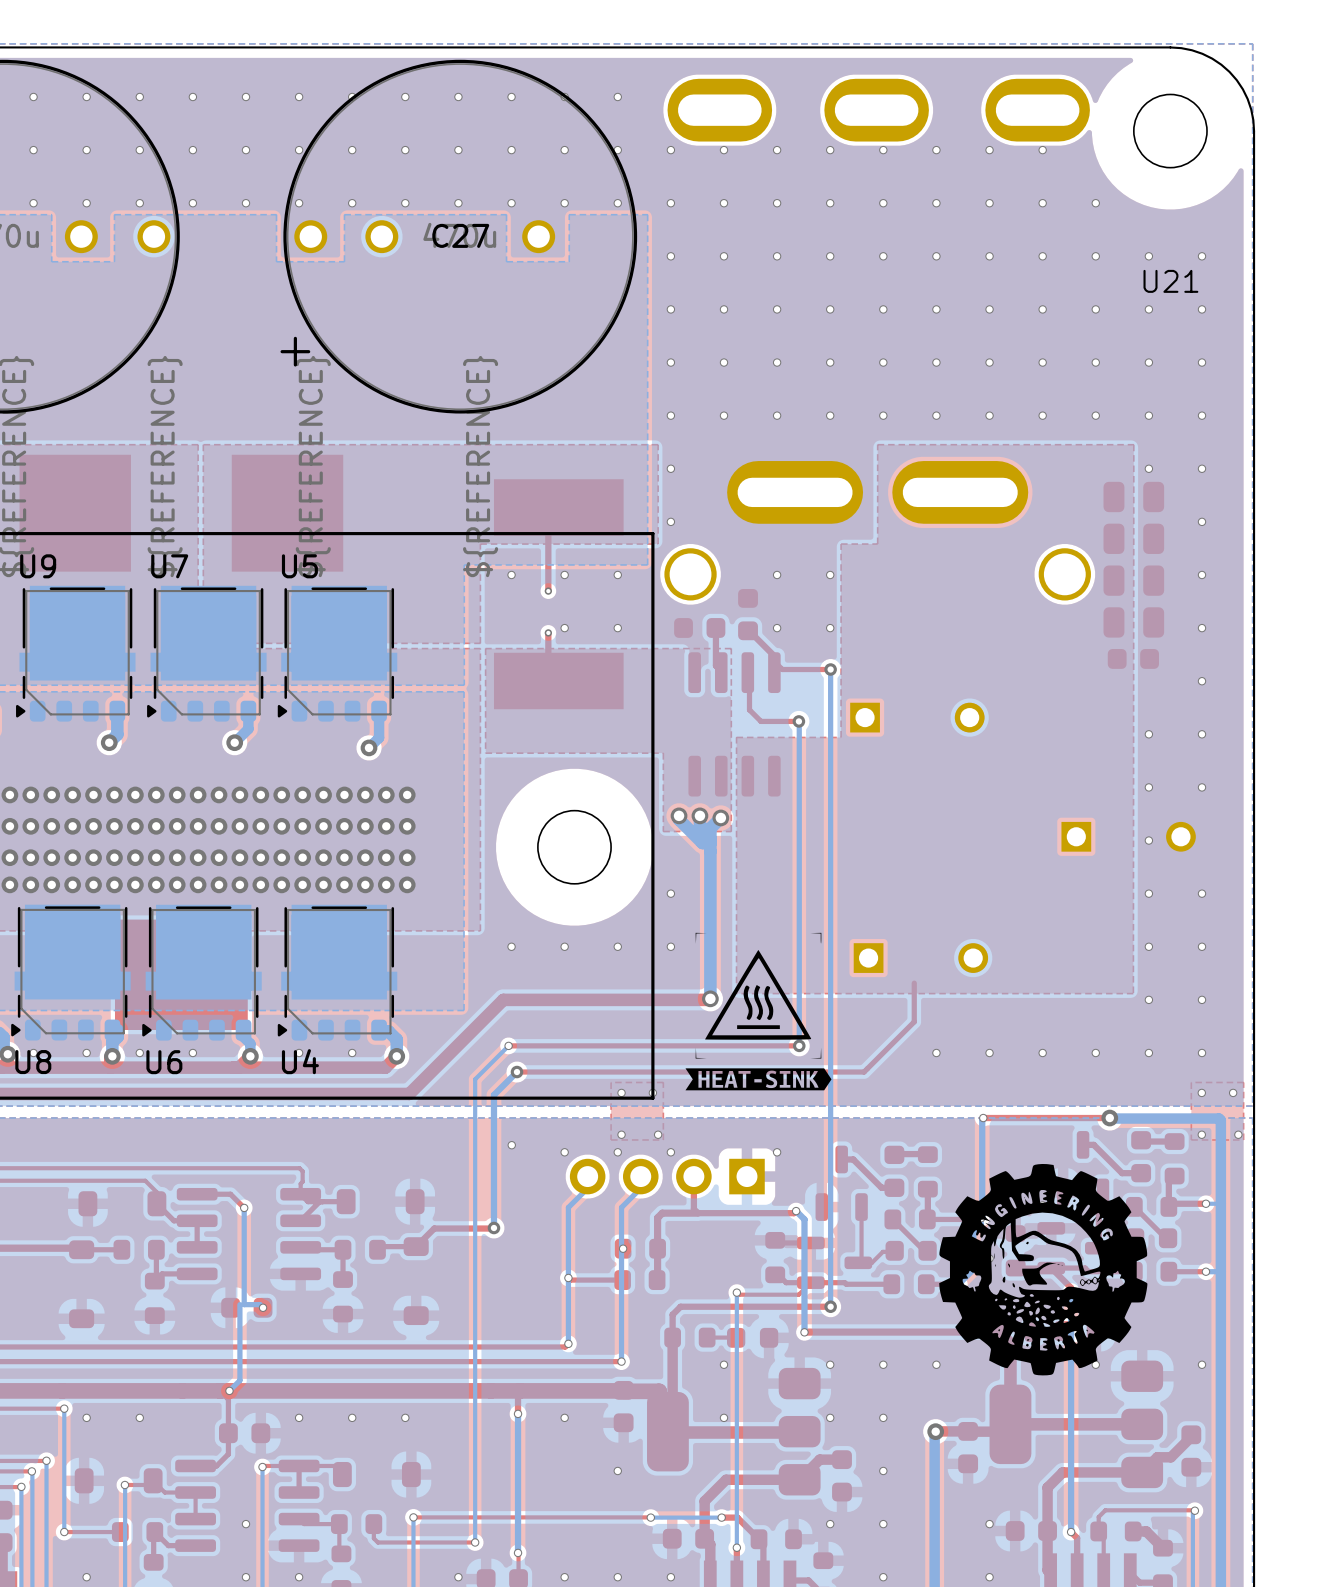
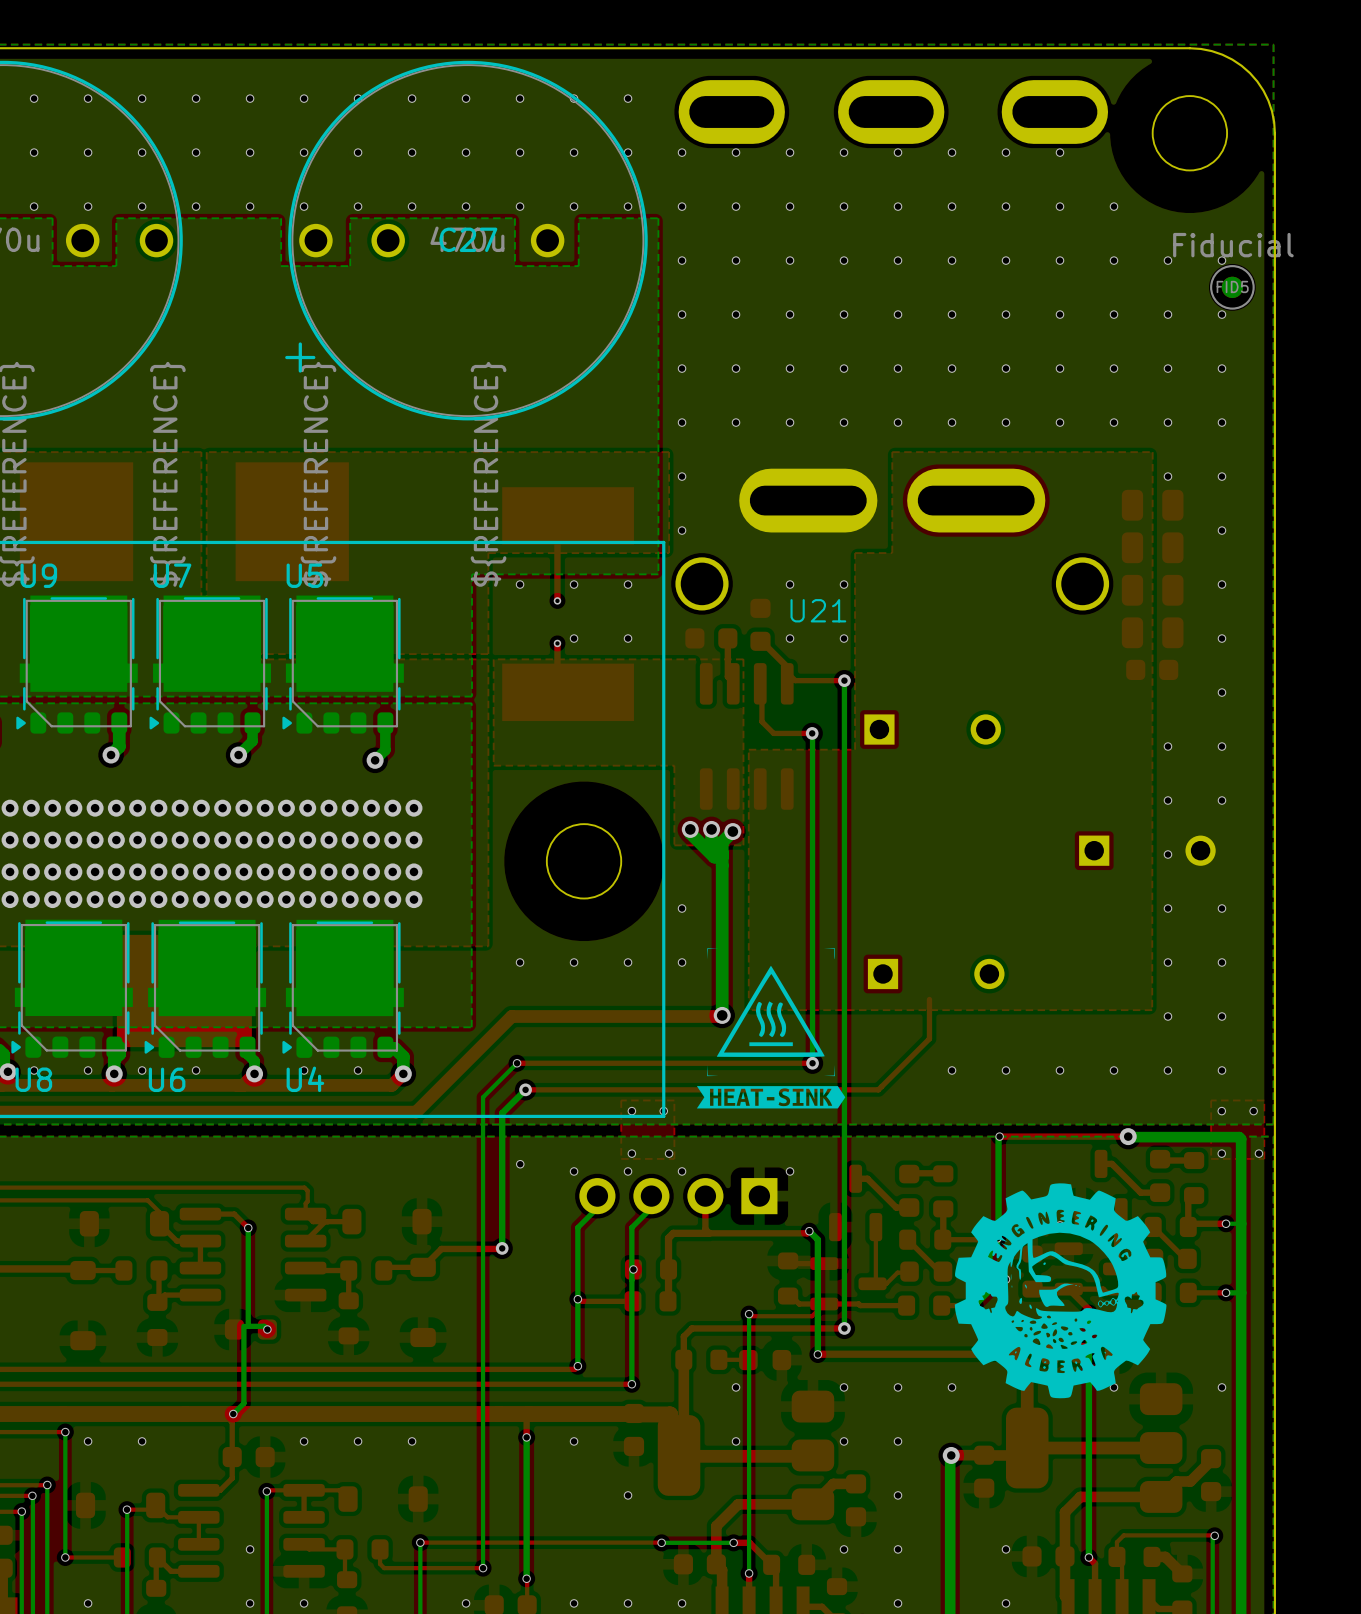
U21 name position: U21 (1170, 281) -> U21 (818, 610)
FID5: none -> Fiducial (1232, 287)

